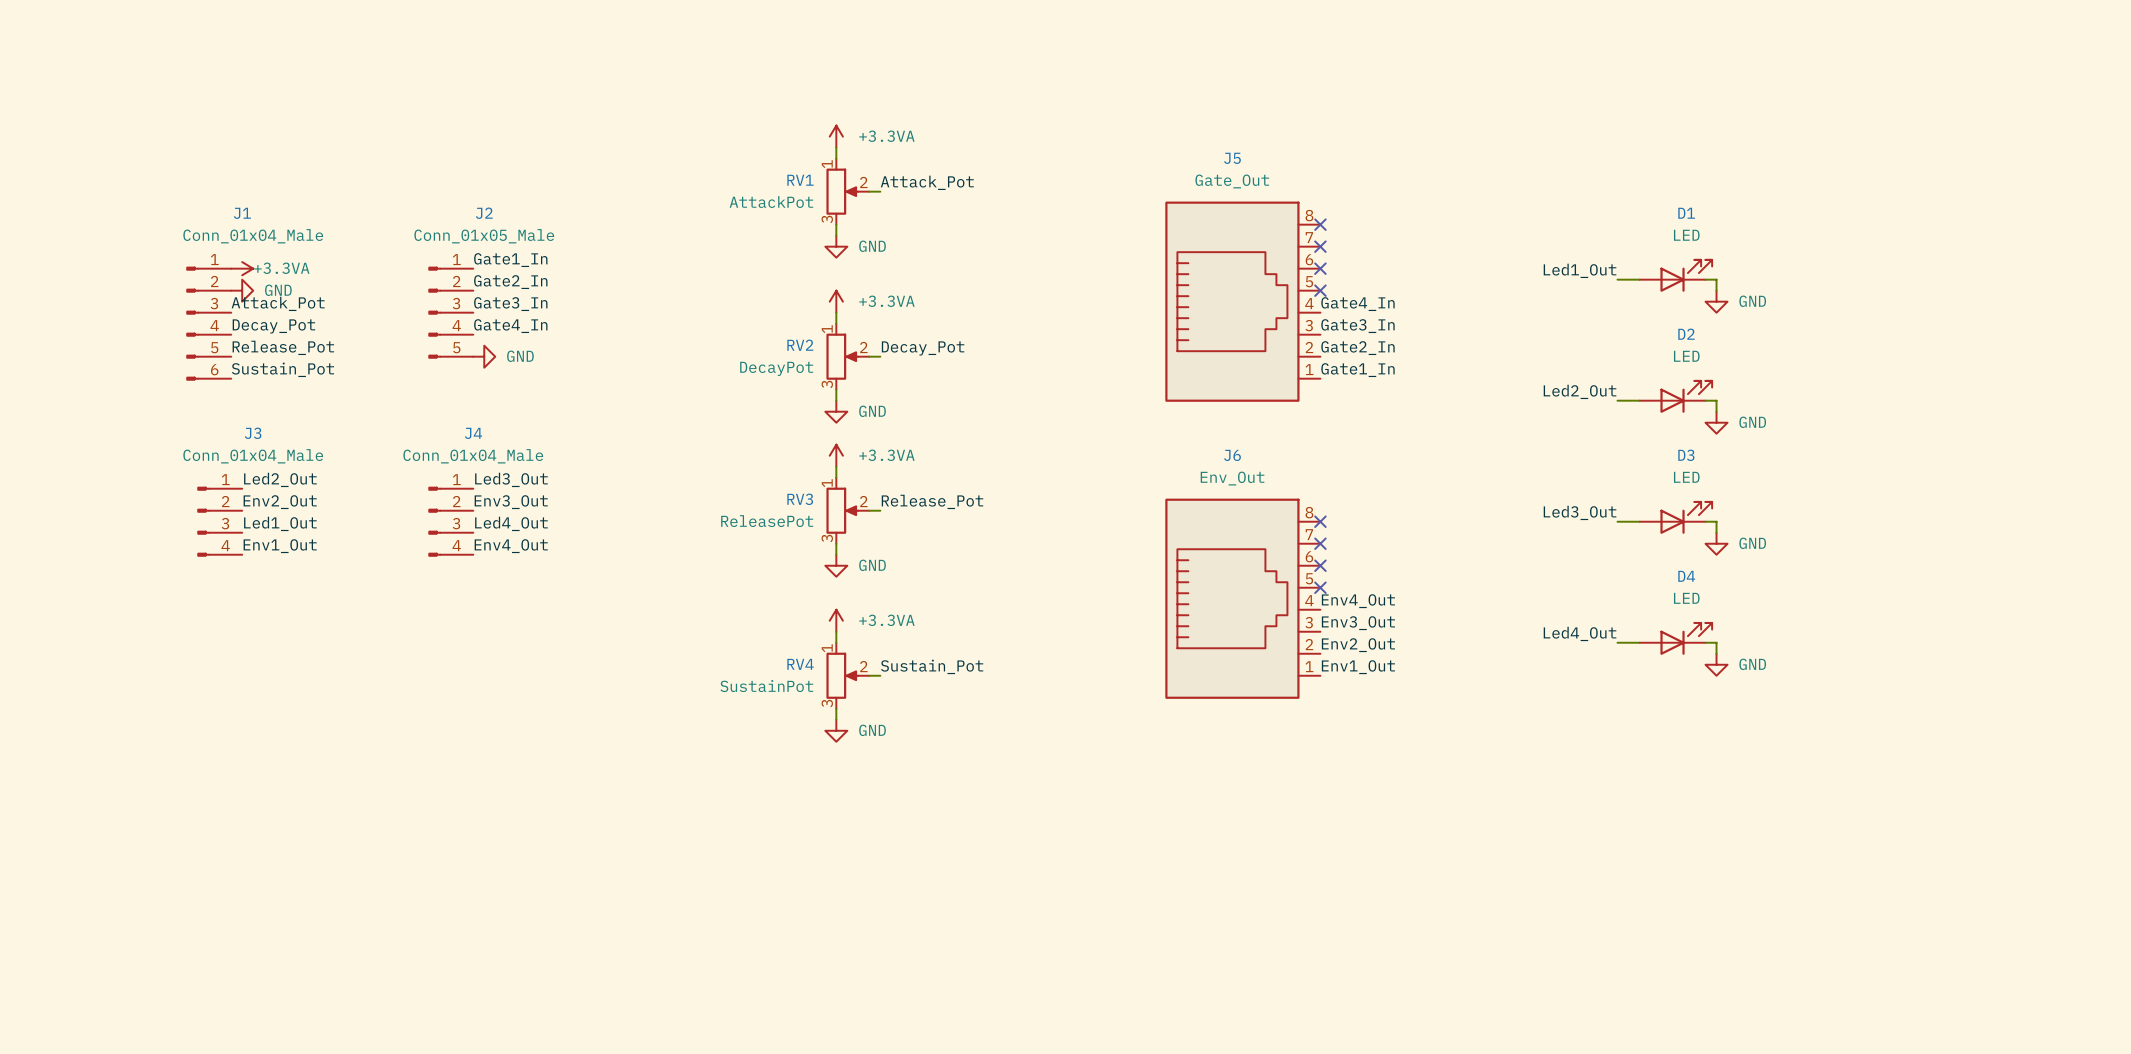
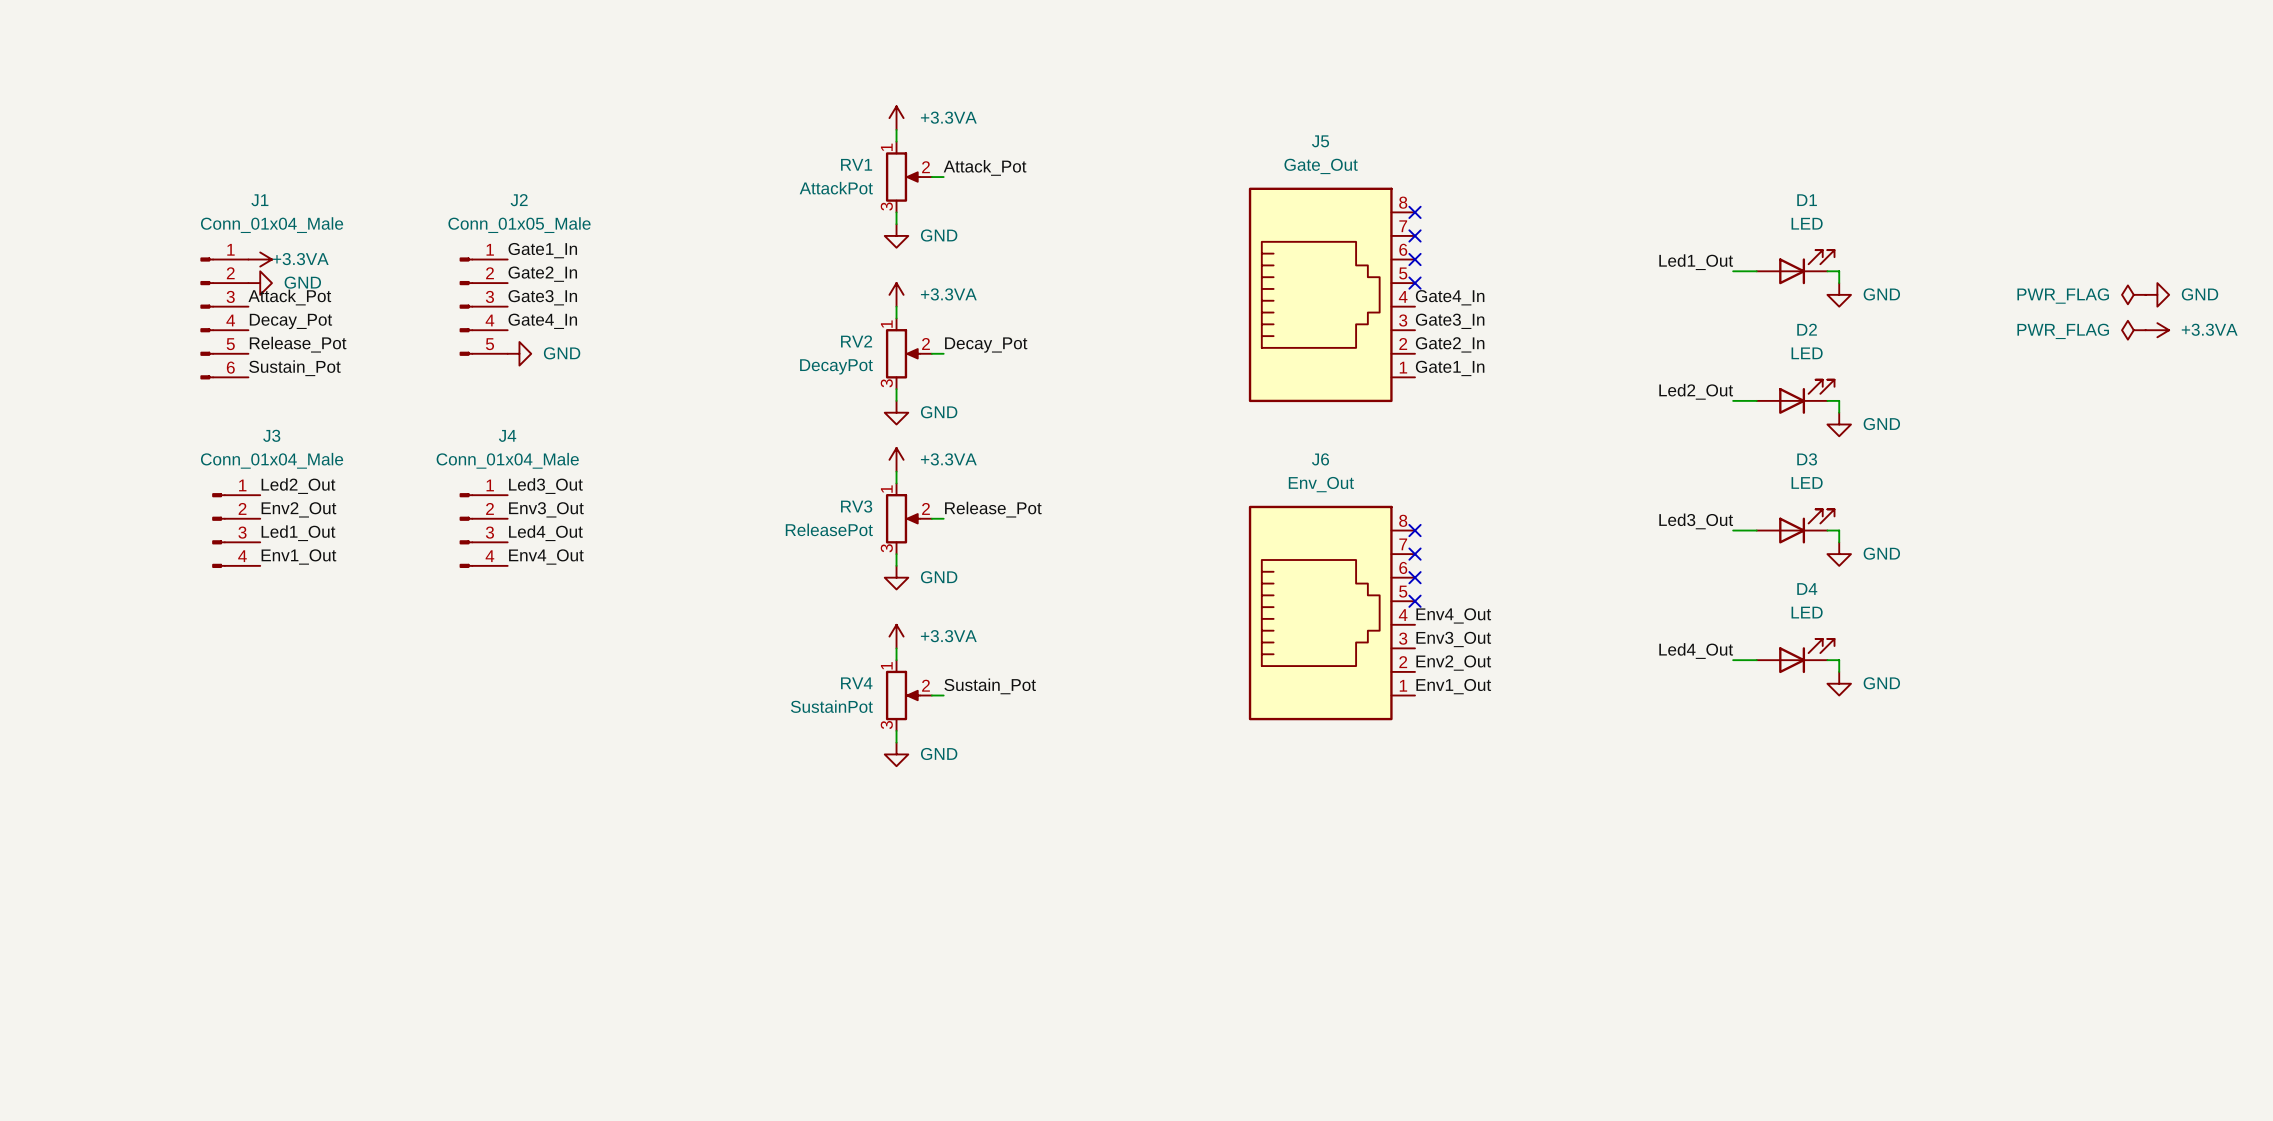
power symbol: none -> PWR_FLAG (2133, 294)
power symbol: none -> GND (2157, 294)
power symbol: none -> PWR_FLAG (2133, 330)
power symbol: none -> +3.3VA (2157, 330)

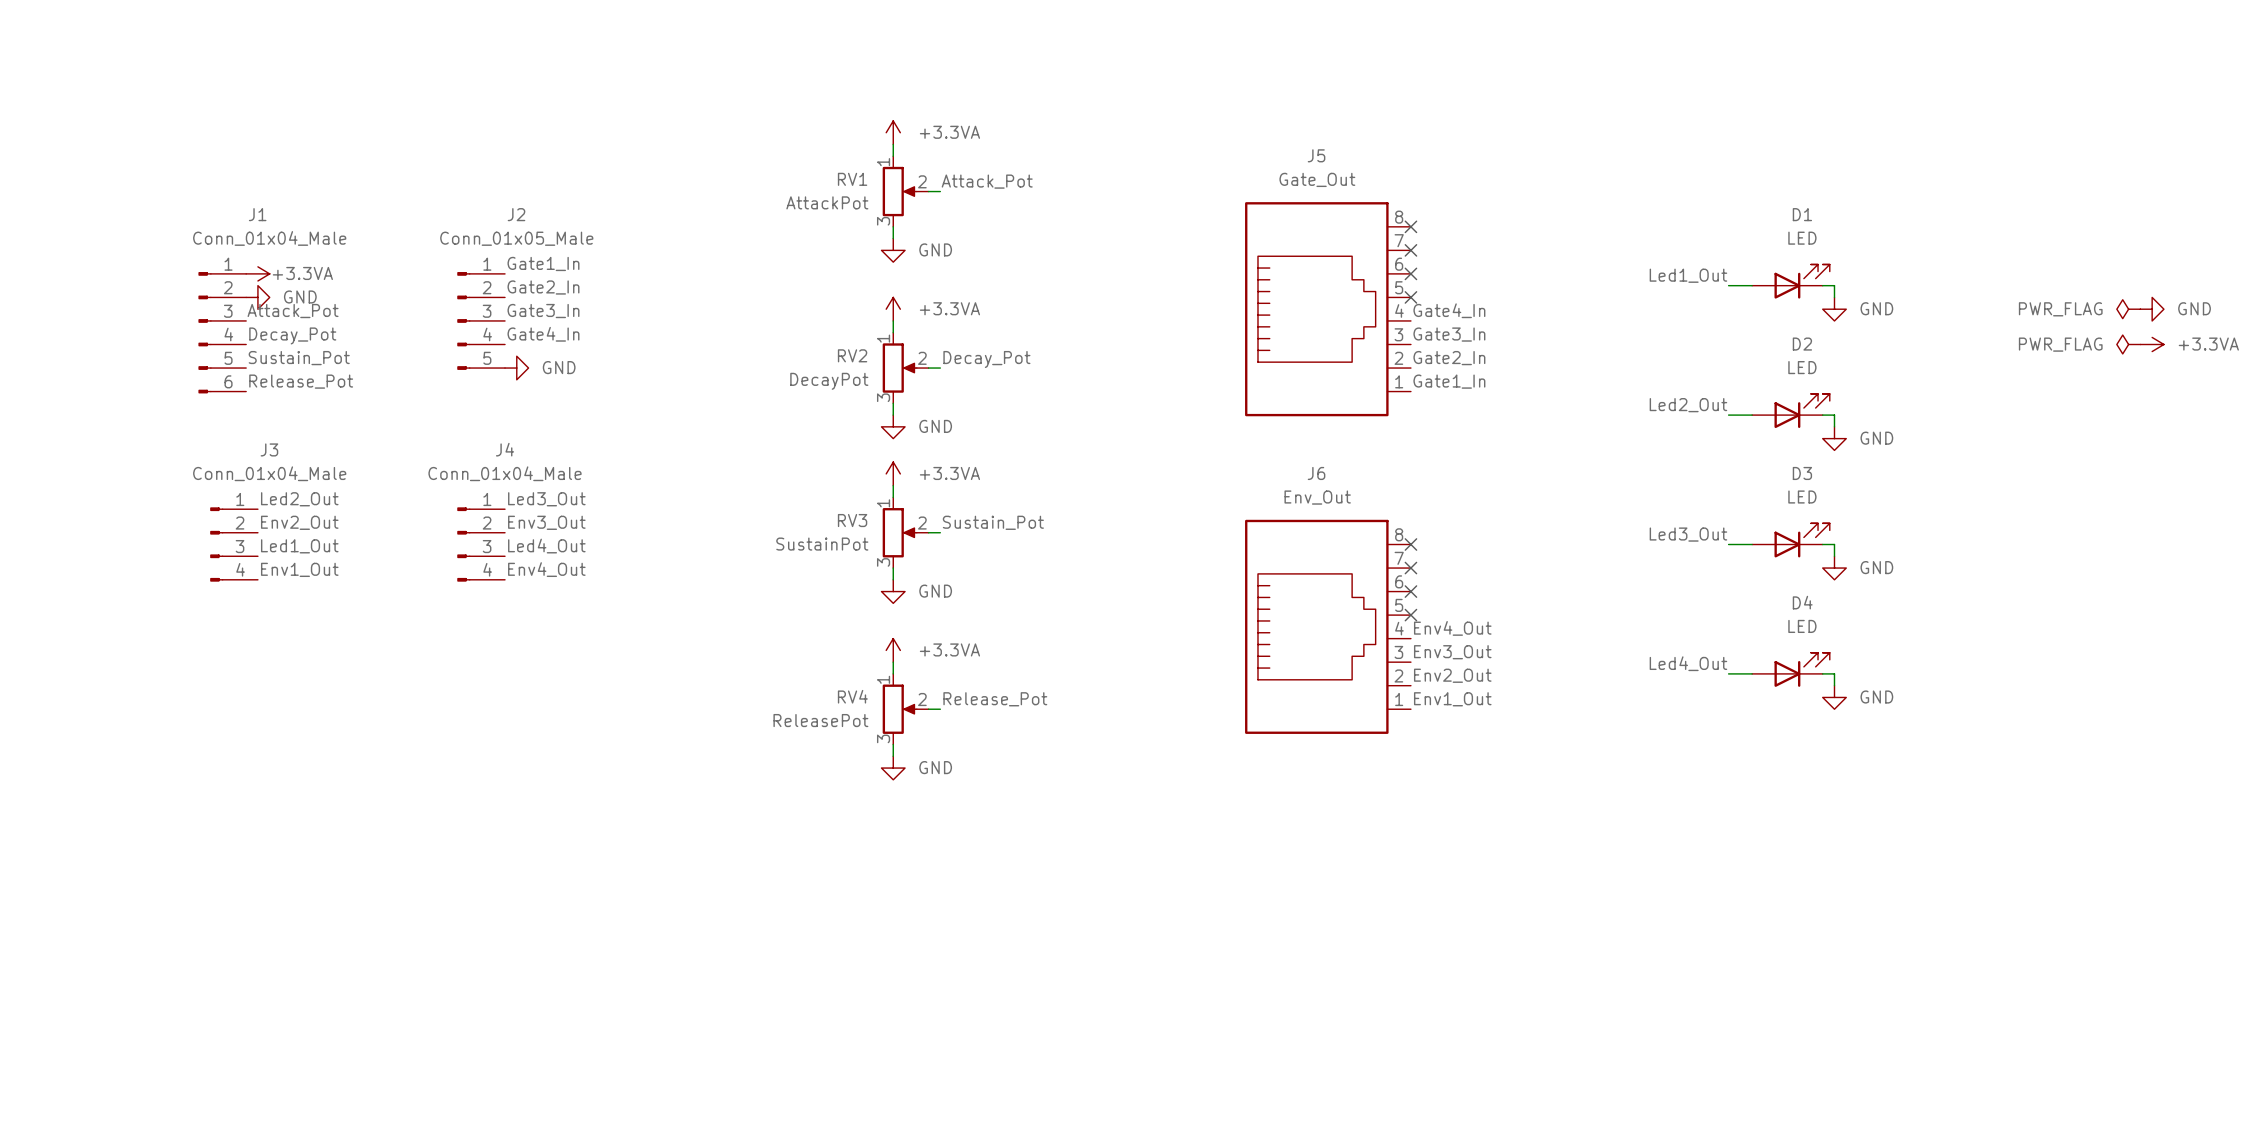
label: Release_Pot (298, 344) -> Sustain_Pot (299, 358)
label: Sustain_Pot (294, 368) -> Release_Pot (301, 381)
label: Release_Pot (993, 509) -> Sustain_Pot (993, 522)
RV3 value: ReleasePot (829, 529) -> SustainPot (822, 544)
label: Sustain_Pot (990, 686) -> Release_Pot (995, 699)
RV4 value: SustainPot (831, 706) -> ReleasePot (820, 720)

